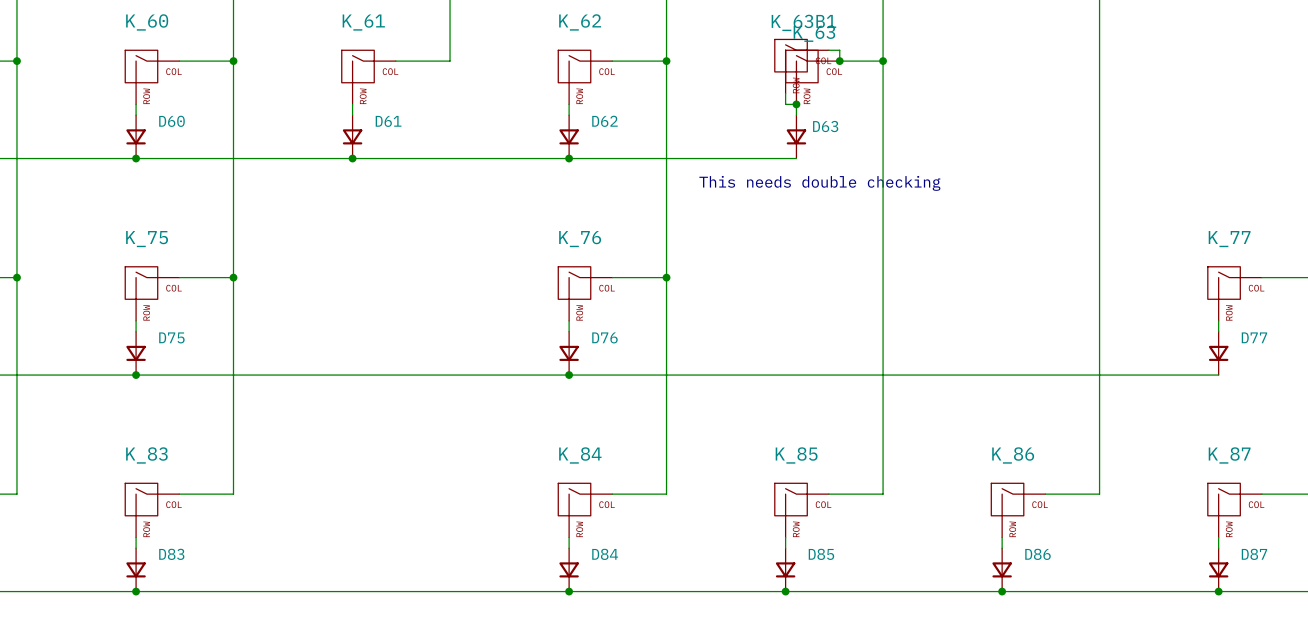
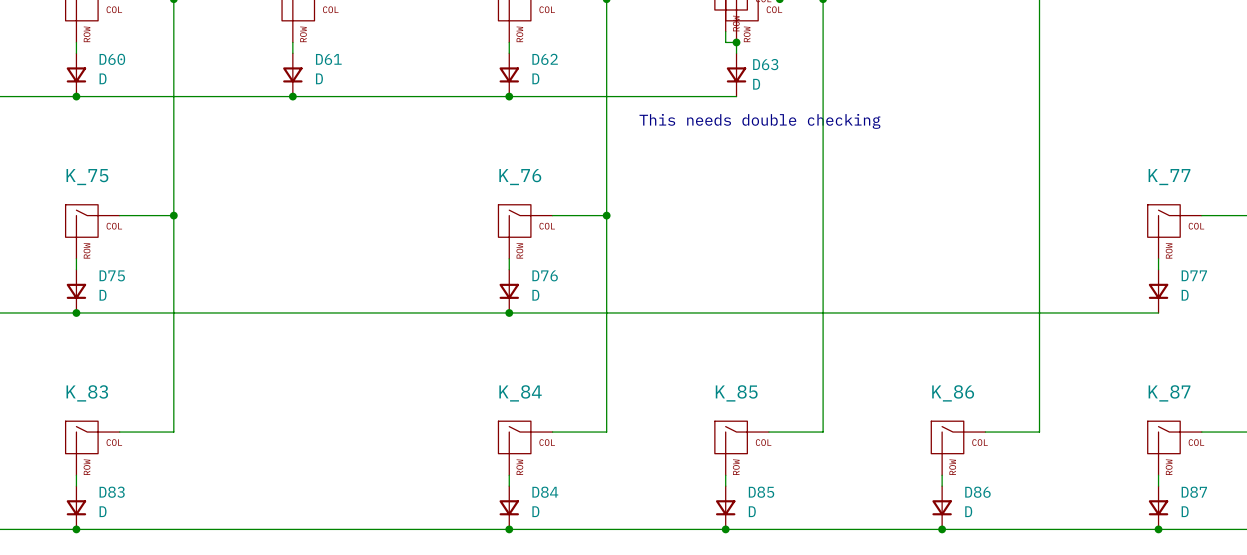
D60 value: none -> D (103, 78)
D61 value: none -> D (319, 78)
D62 value: none -> D (535, 78)
D63 value: none -> D (756, 84)
D75 value: none -> D (103, 295)
D76 value: none -> D (535, 295)
D77 value: none -> D (1185, 295)
D83 value: none -> D (103, 511)
D84 value: none -> D (535, 511)
D85 value: none -> D (752, 511)
D86 value: none -> D (968, 511)
D87 value: none -> D (1185, 511)

